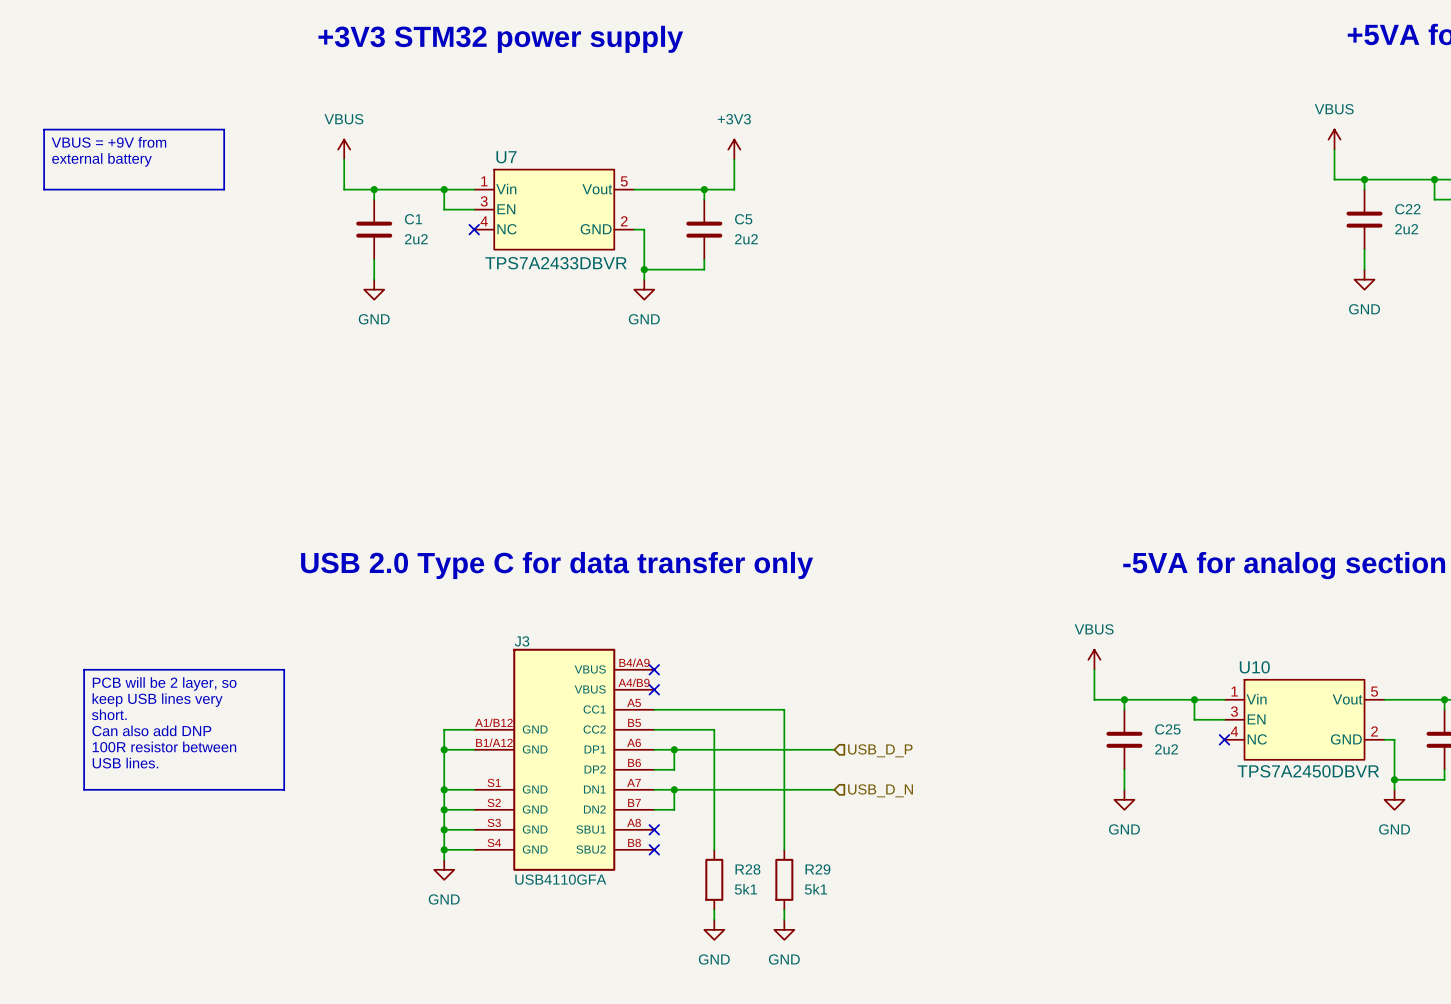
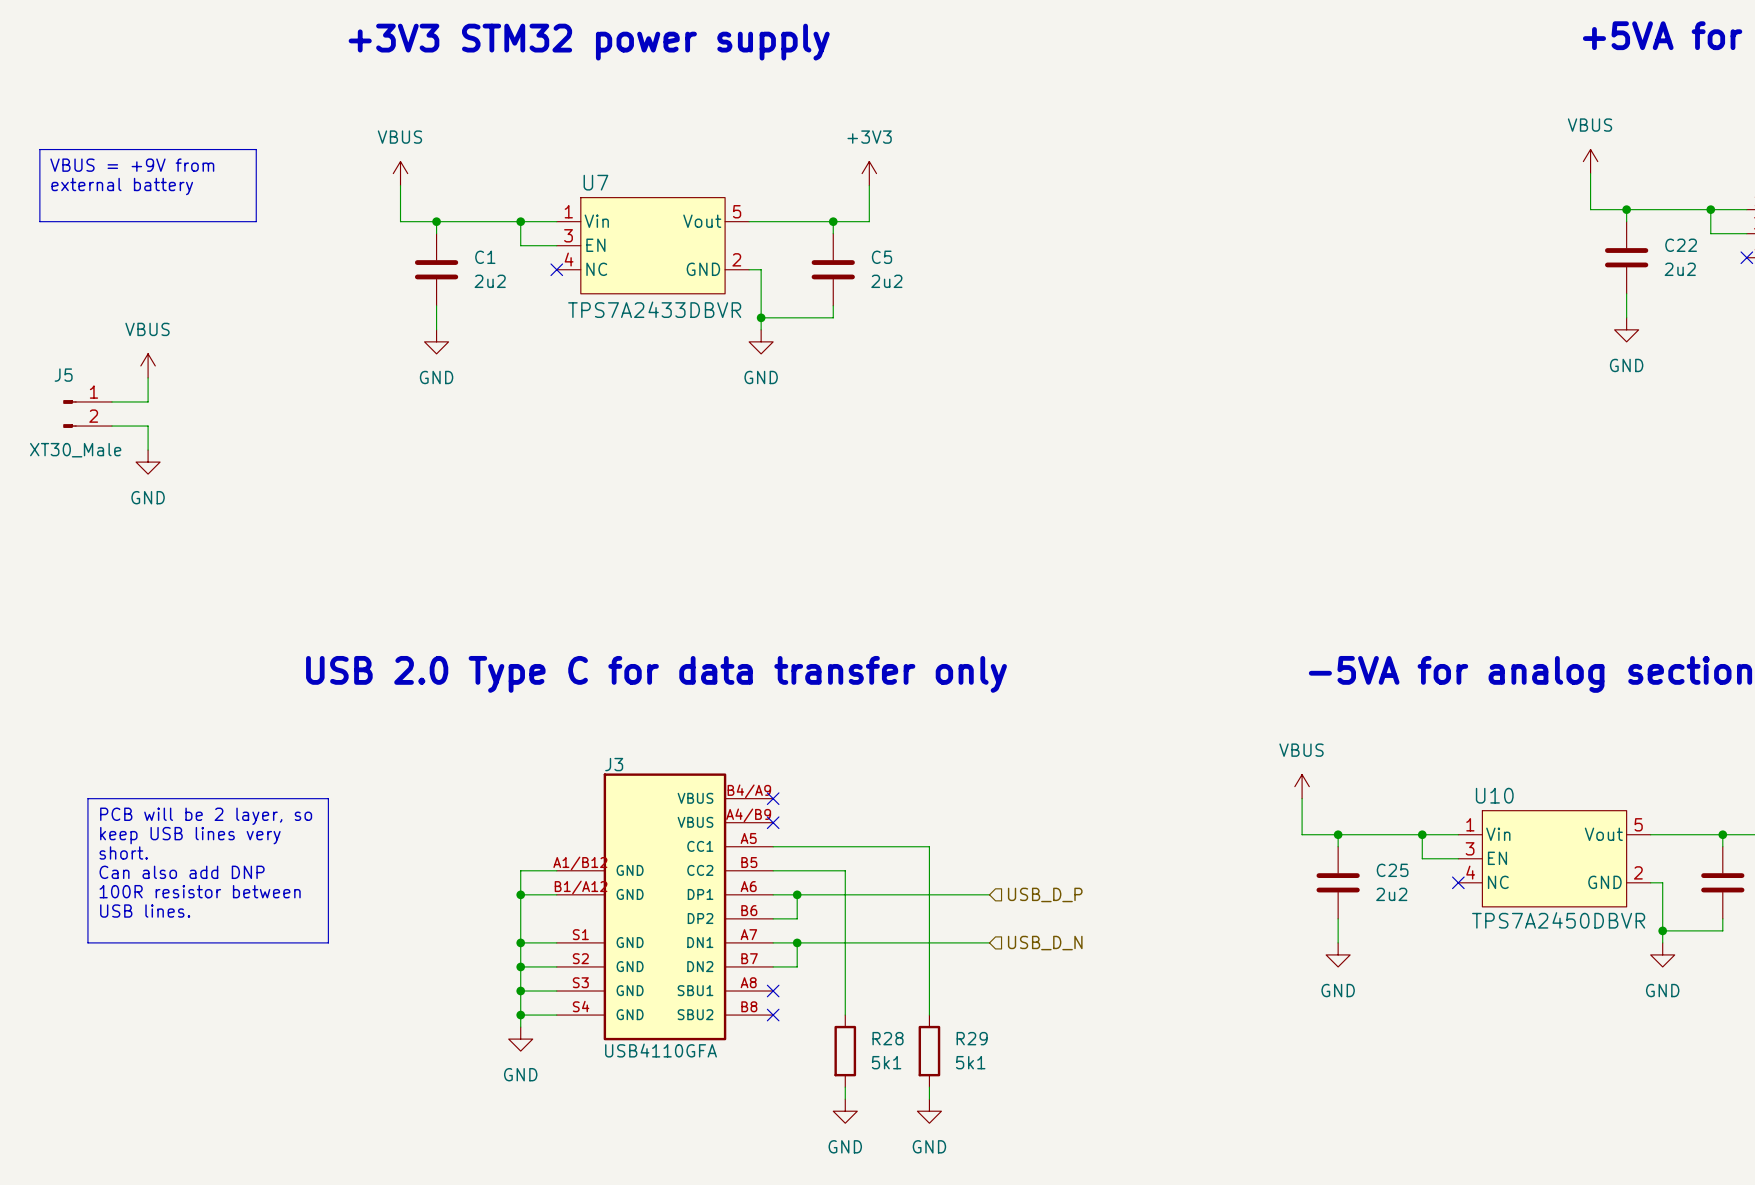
power symbol: none -> VBUS (148, 365)
wire: none -> (148, 377) (148, 401) (112, 401)
J5: none -> XT30_Male (87, 414)
wire: none -> (112, 426) (148, 426) (148, 450)
power symbol: none -> GND (148, 462)

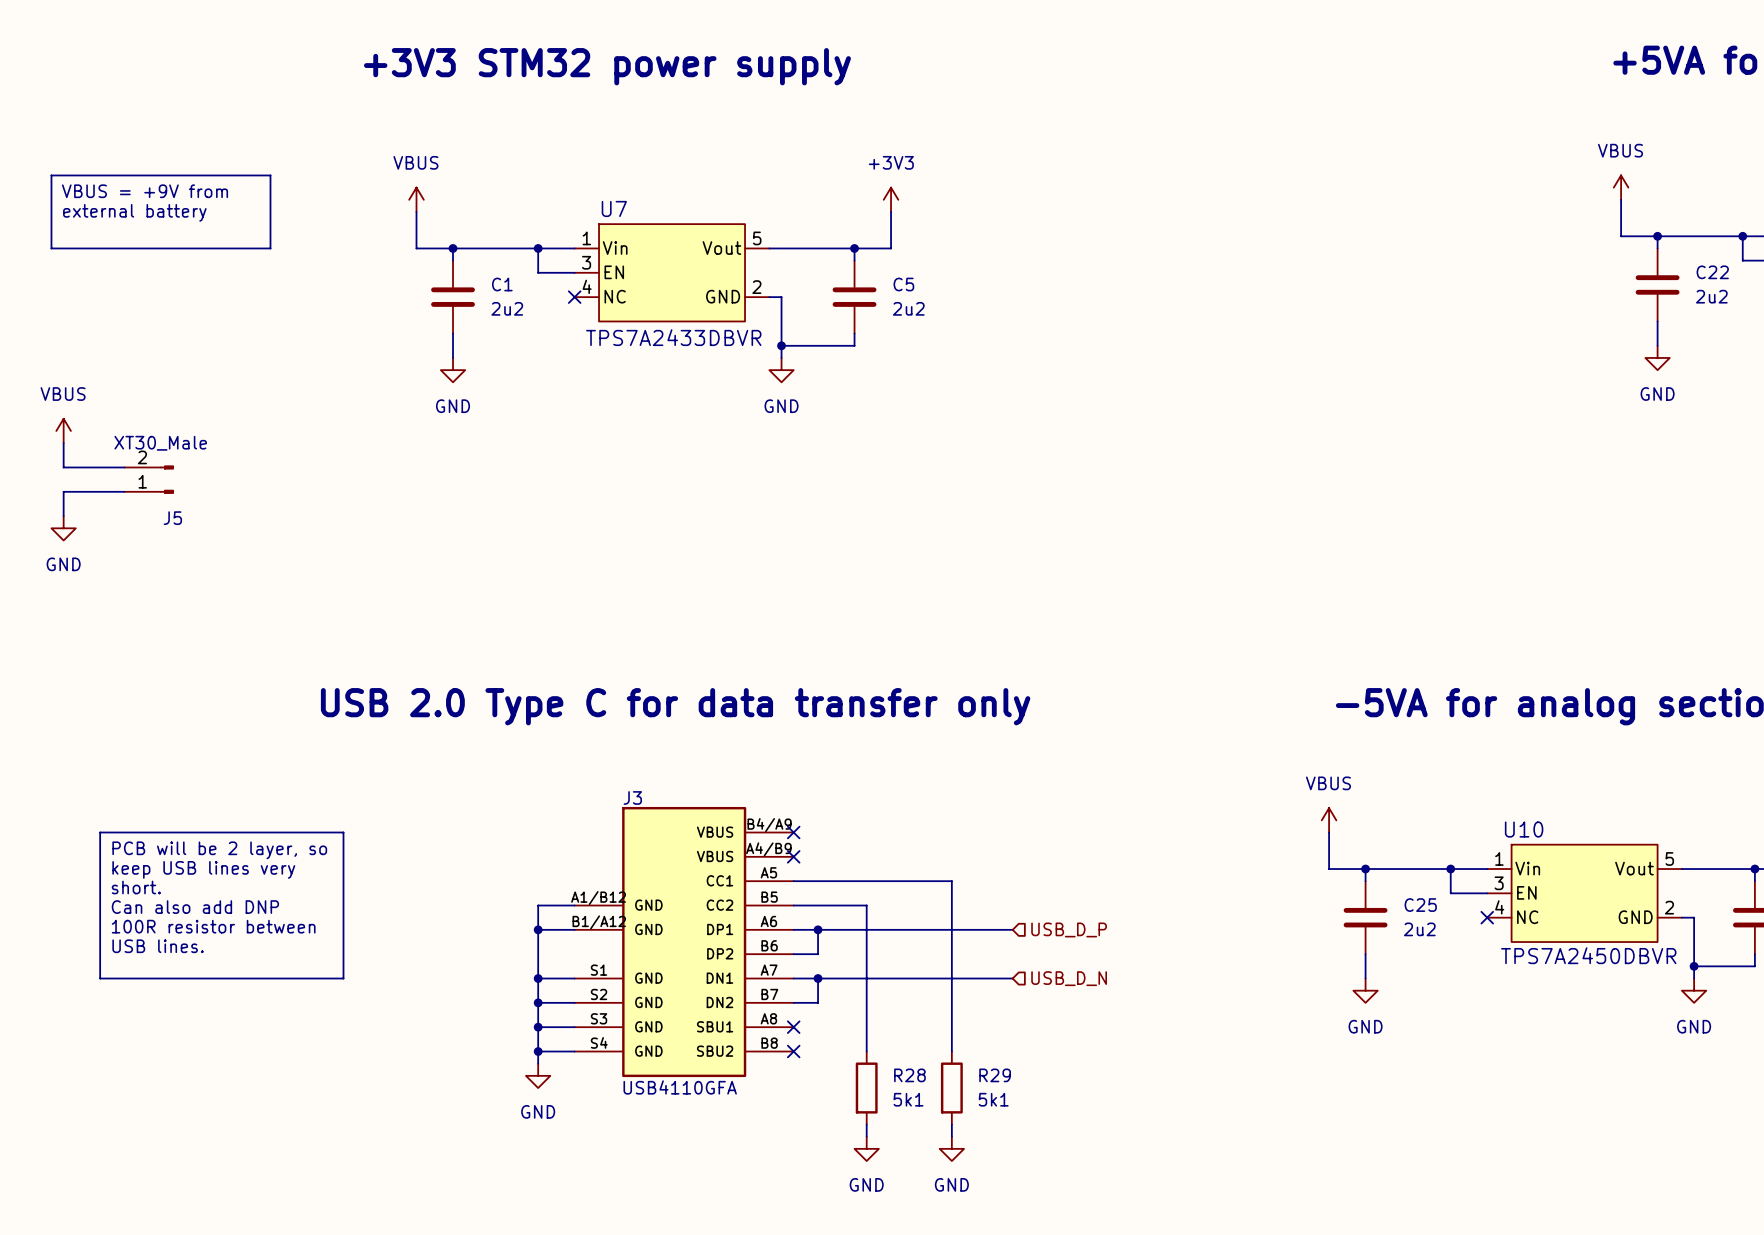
power symbol position: VBUS (148, 365) -> VBUS (63, 430)
wire: (148, 377) (148, 401) (112, 401) -> none
wire: none -> (63, 443) (63, 467) (124, 467)
J5 rotation: 0° (69, 414) -> 180° (167, 479)
J5 position: (87, 414) -> (149, 479)
wire: (112, 426) (148, 426) (148, 450) -> none
wire: none -> (124, 491) (63, 491) (63, 516)
power symbol position: GND (148, 462) -> GND (63, 528)

